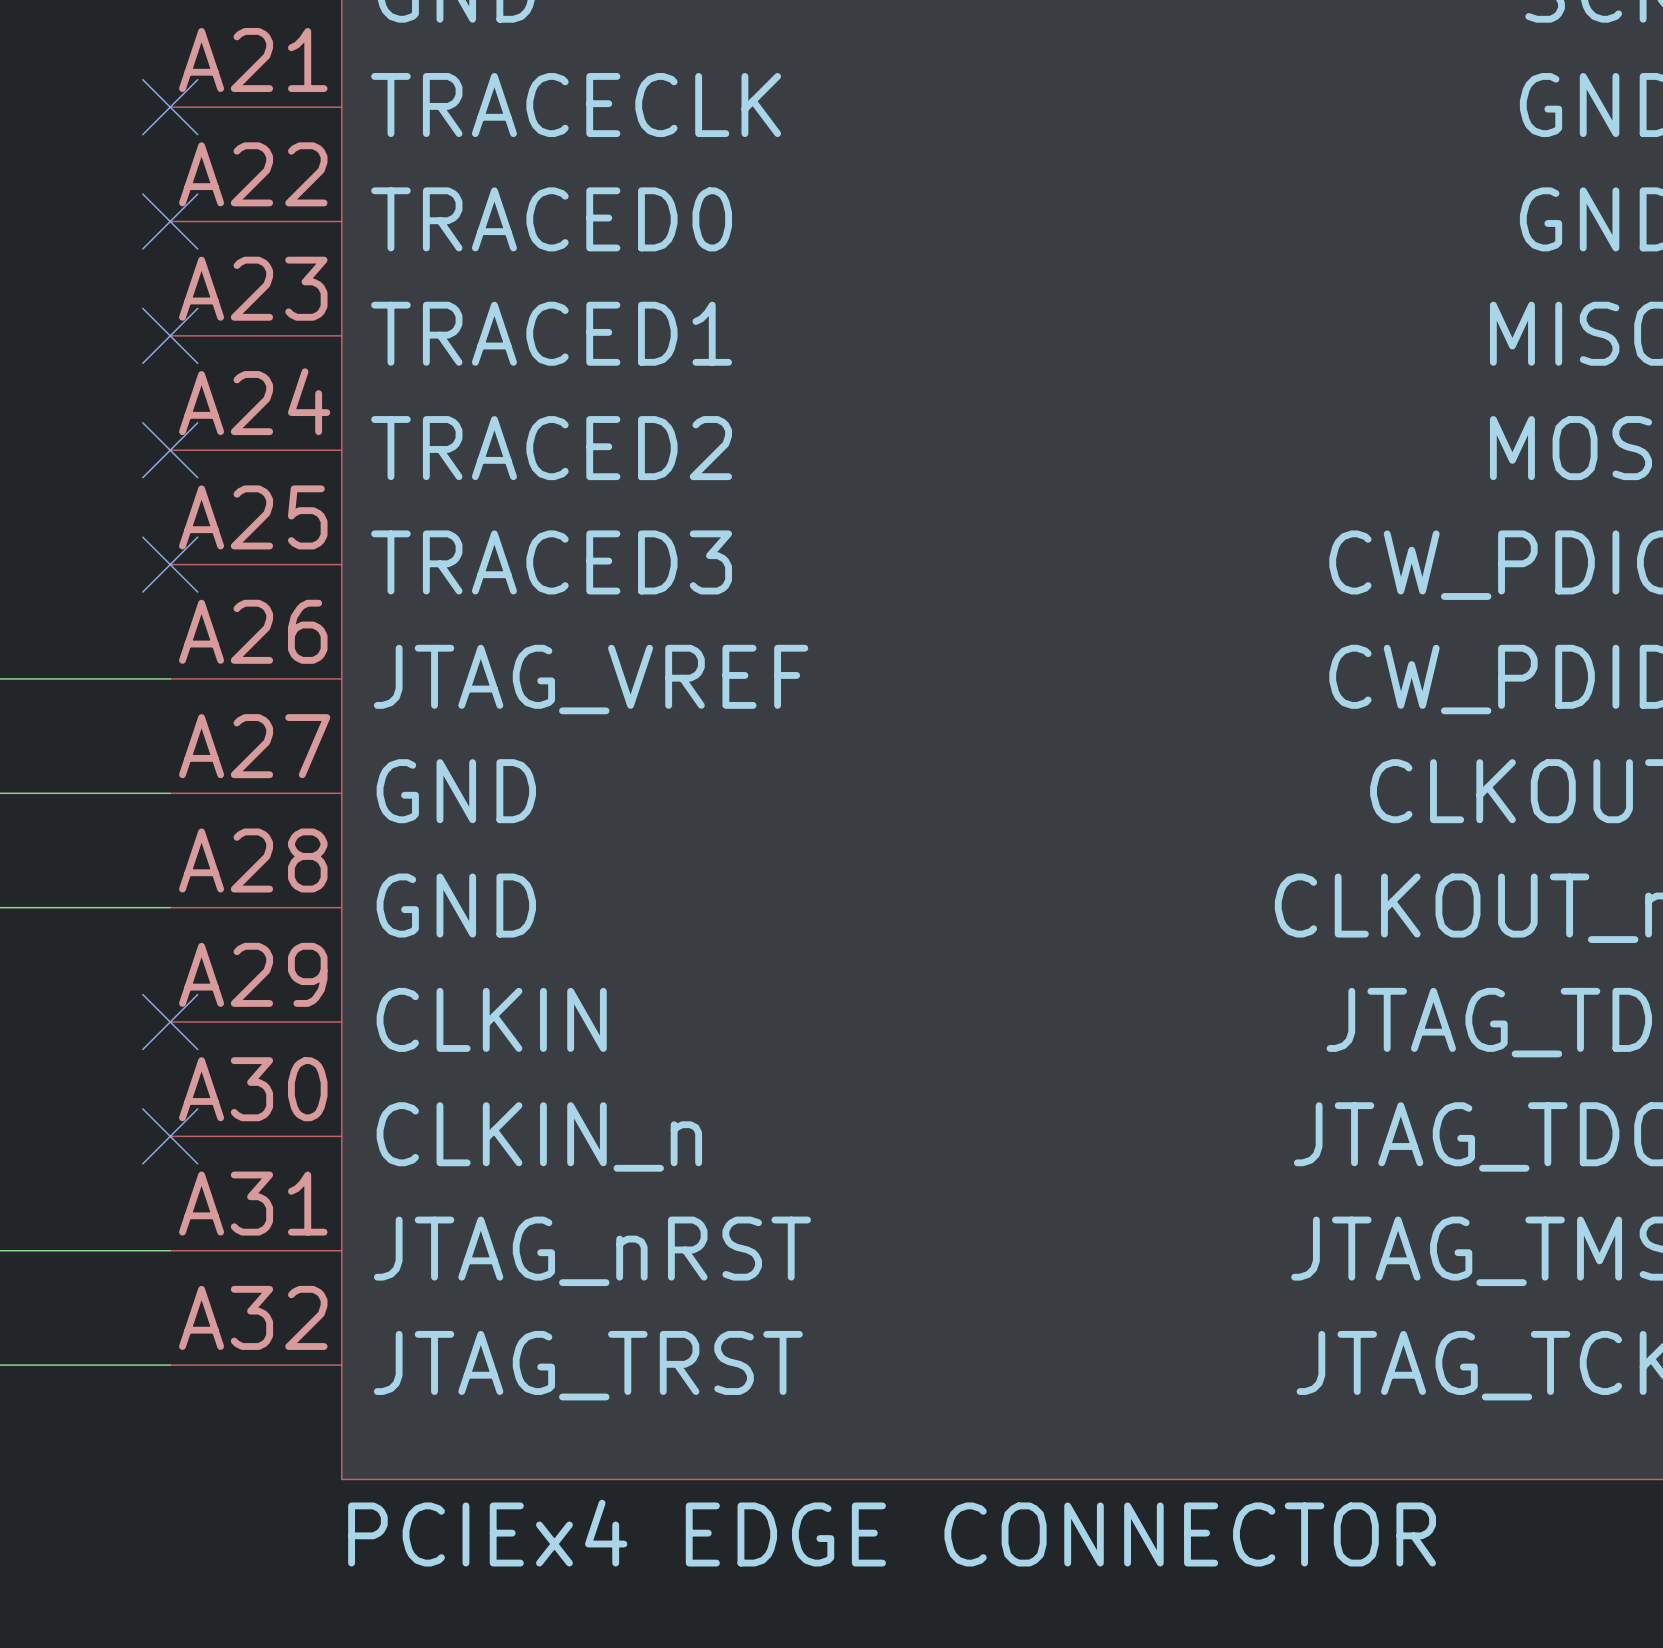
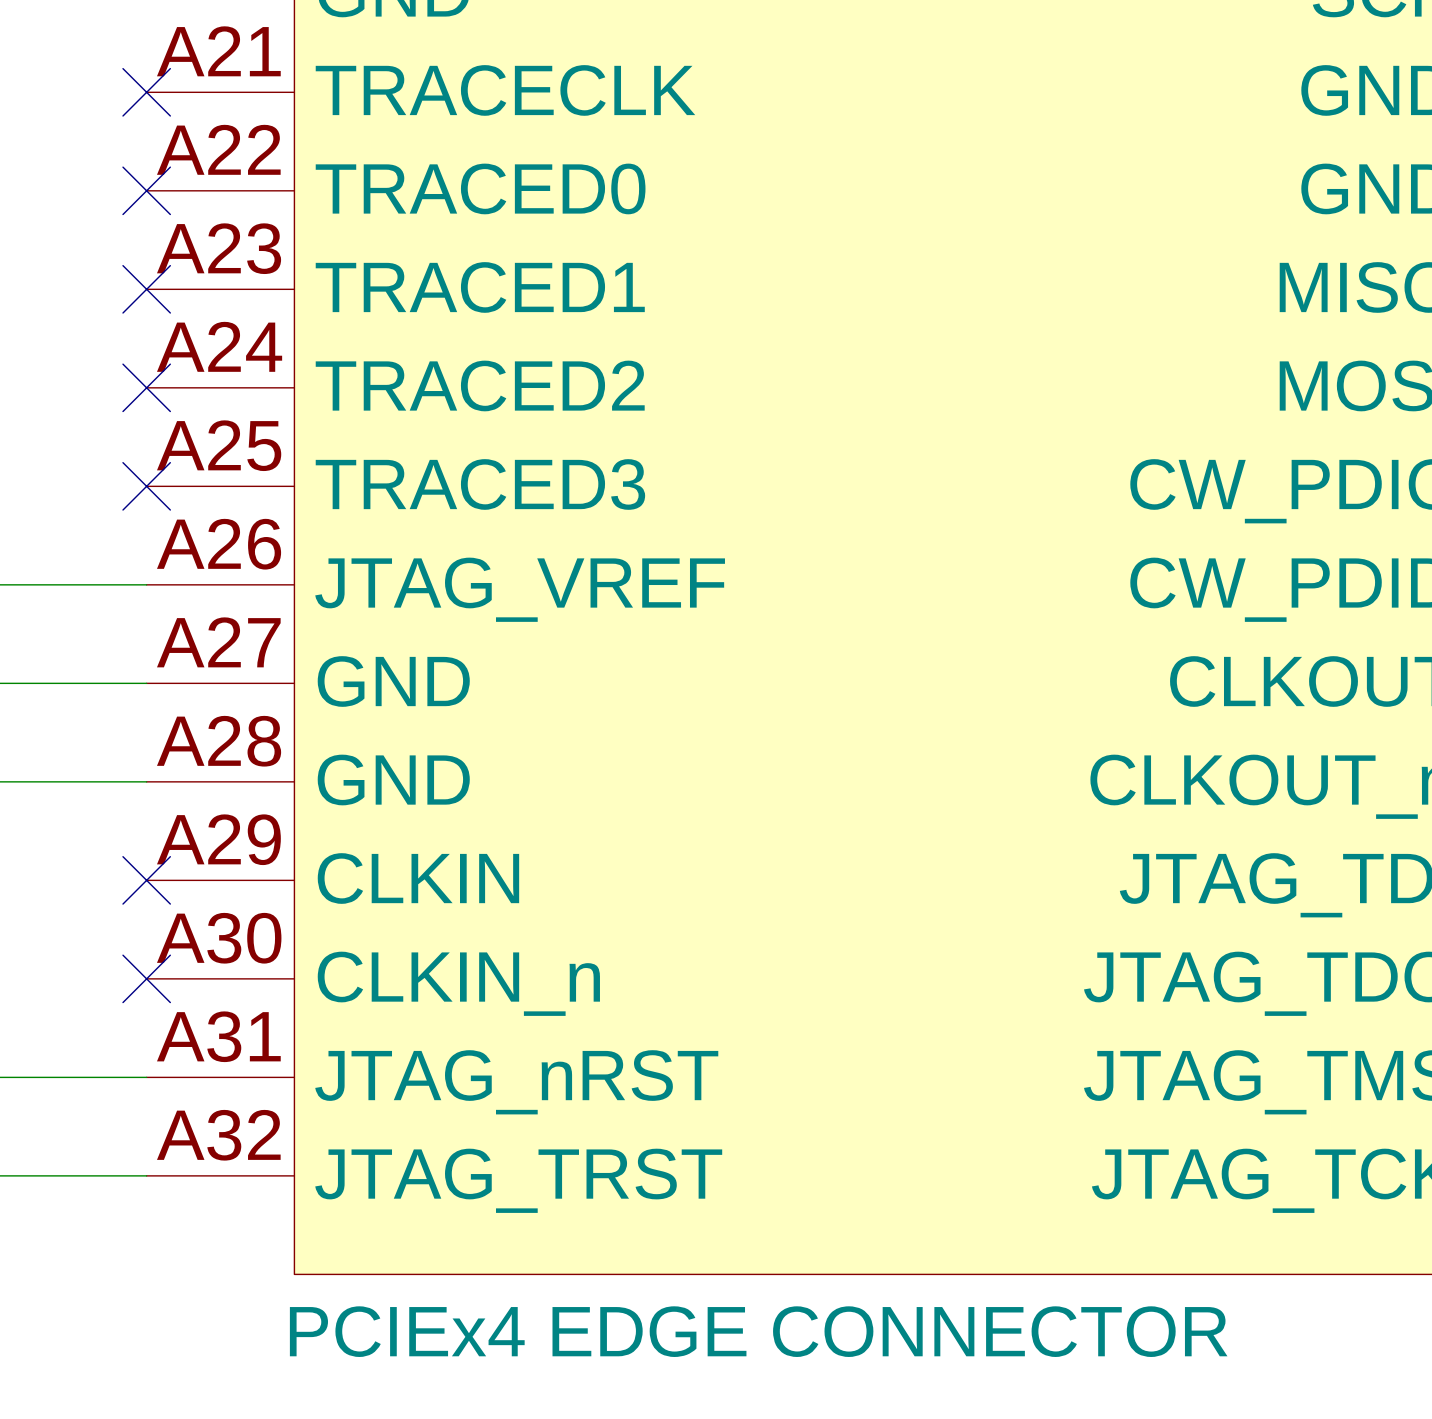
part value position: PCIEx4 EDGE CONNECTOR (892, 1533) -> PCIEx4 EDGE CONNECTOR (758, 1331)

